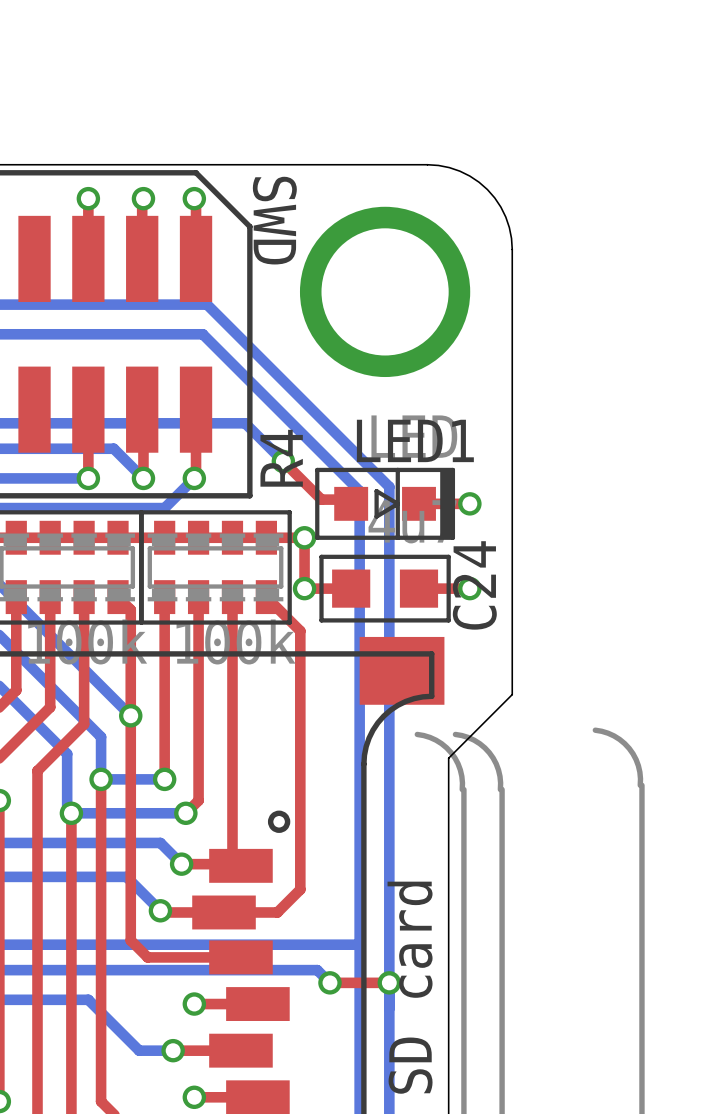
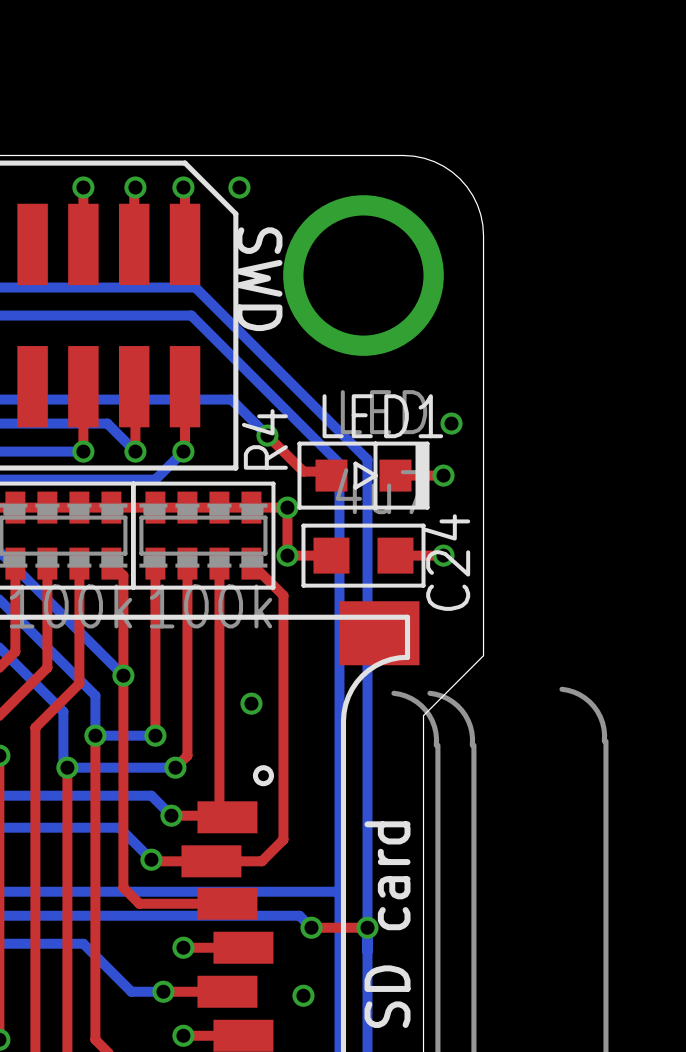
via: none -> (239, 187)
text position: SWD (274, 220) -> SWD (259, 279)
via: none -> (451, 423)
via: none -> (251, 703)
via: none -> (303, 995)

